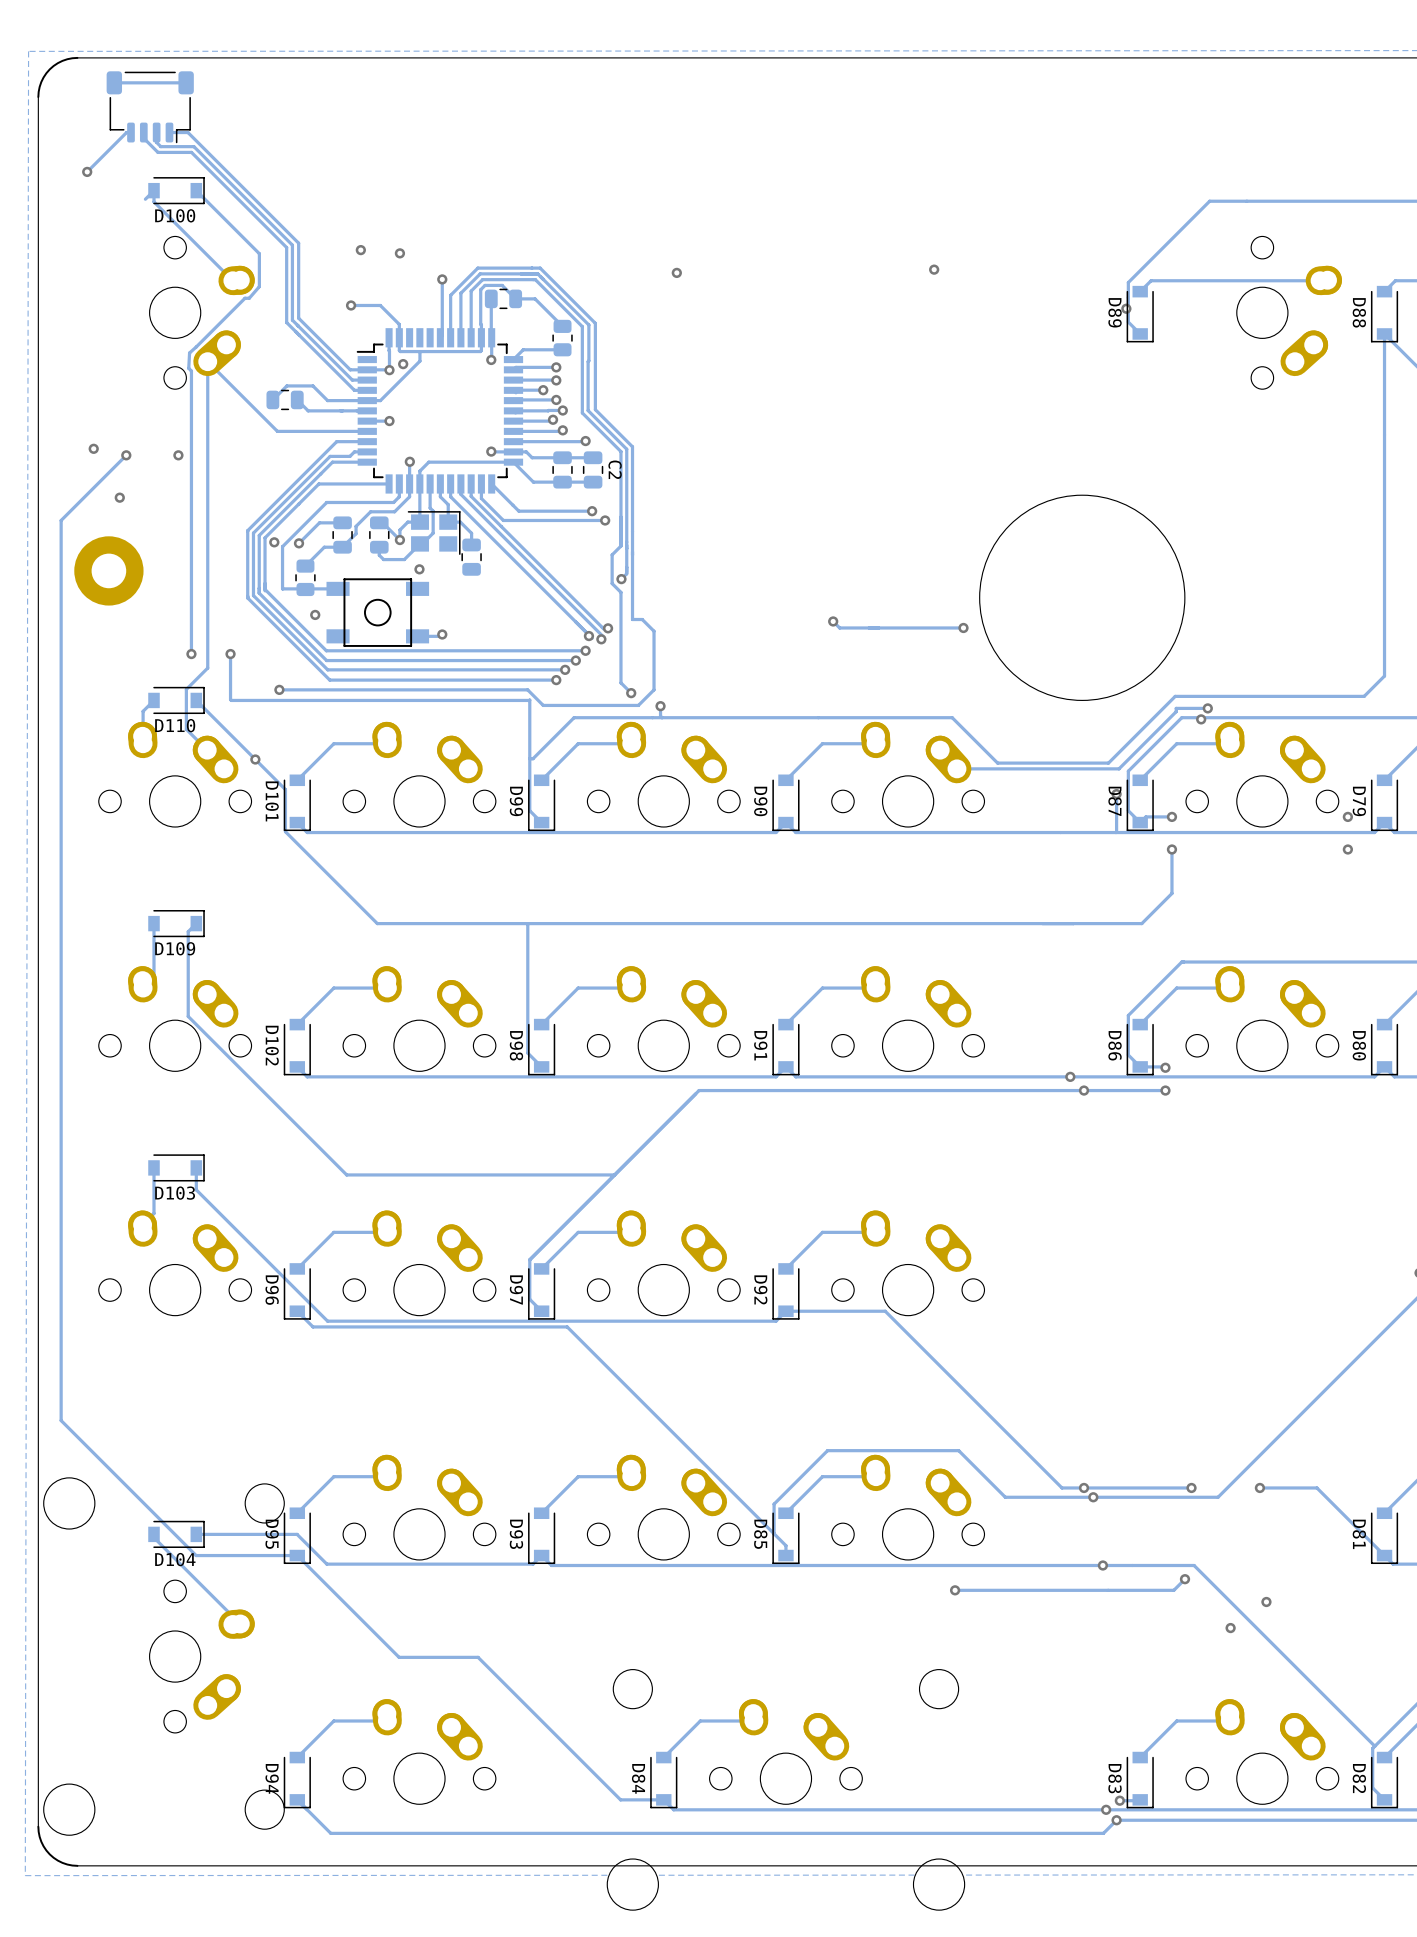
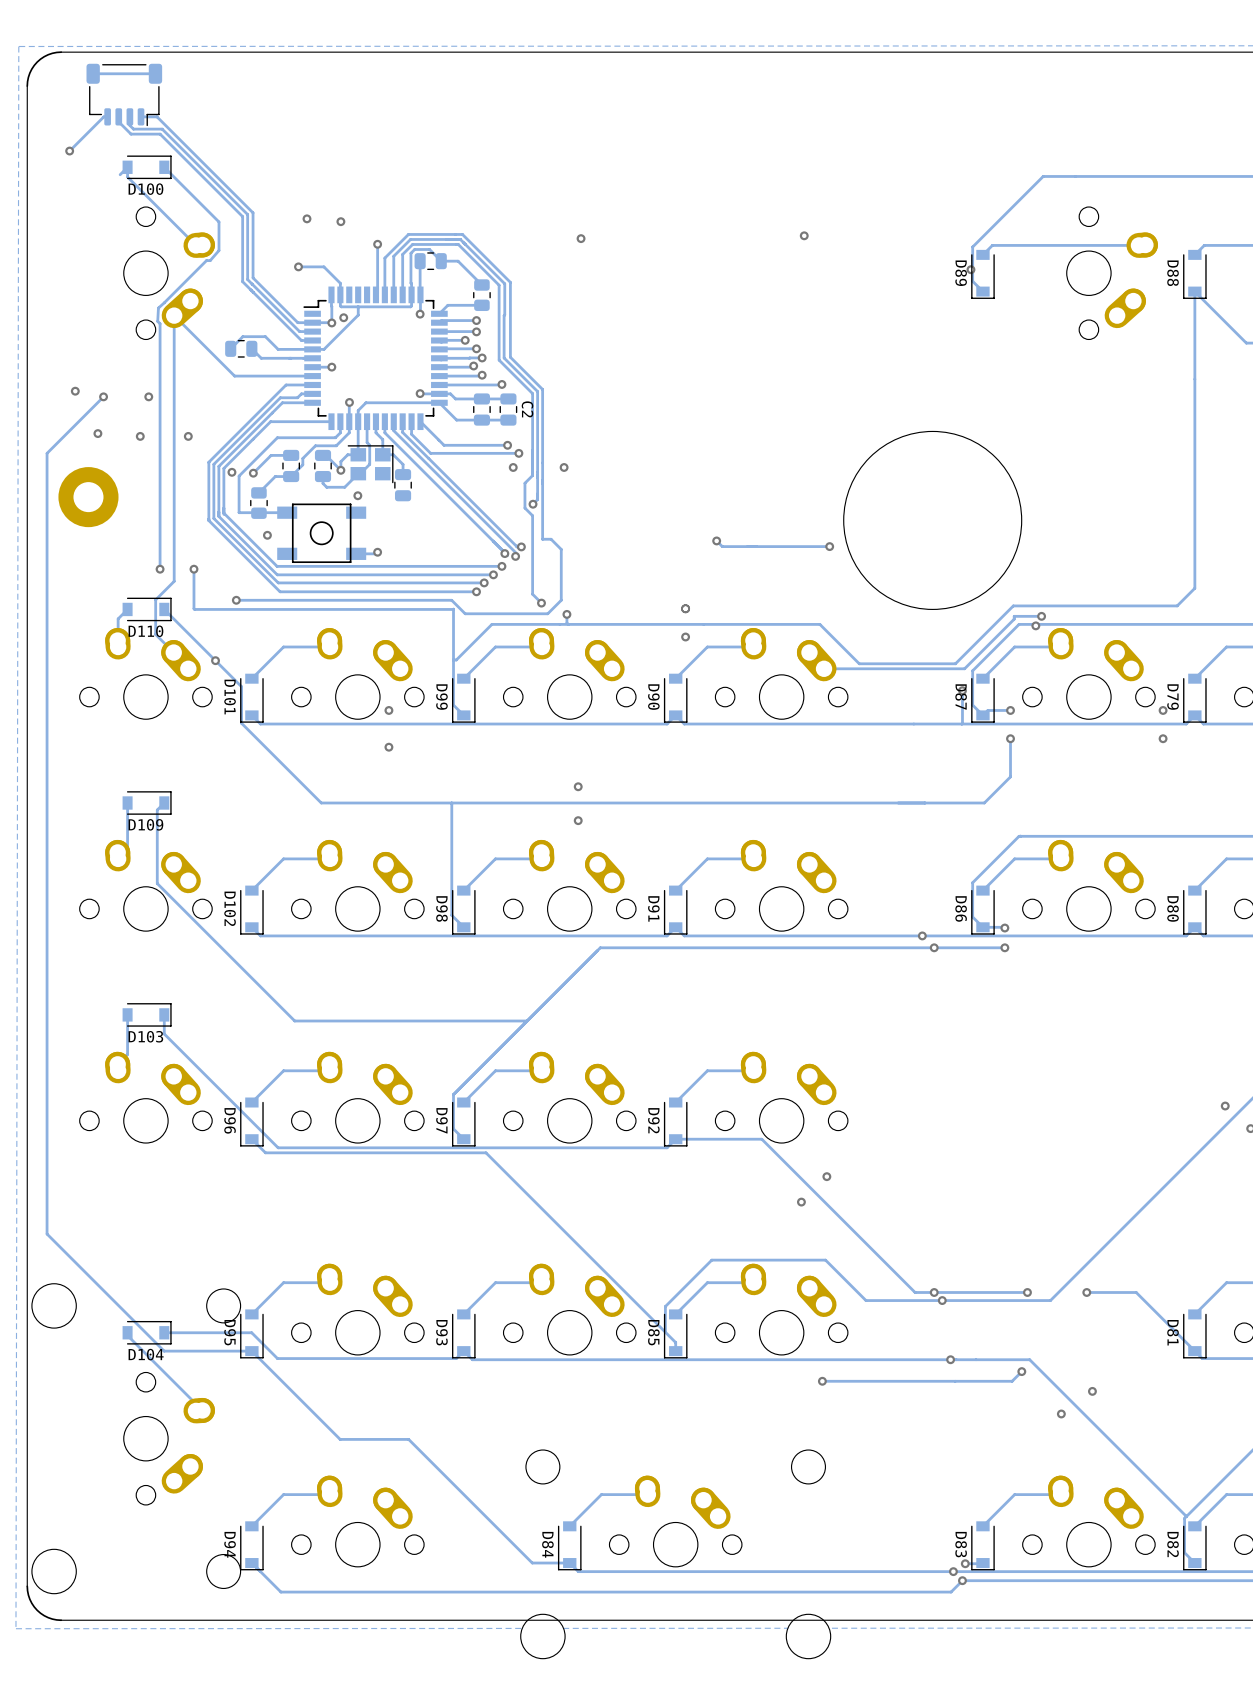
via: none -> (140, 436)
via: none -> (188, 436)
via: none -> (513, 467)
via: none -> (564, 467)
via: none -> (685, 608)
via: none -> (685, 637)
via: none -> (388, 710)
via: none -> (388, 747)
via: none -> (578, 786)
via: none -> (578, 820)
via: none -> (826, 1176)
via: none -> (801, 1202)

